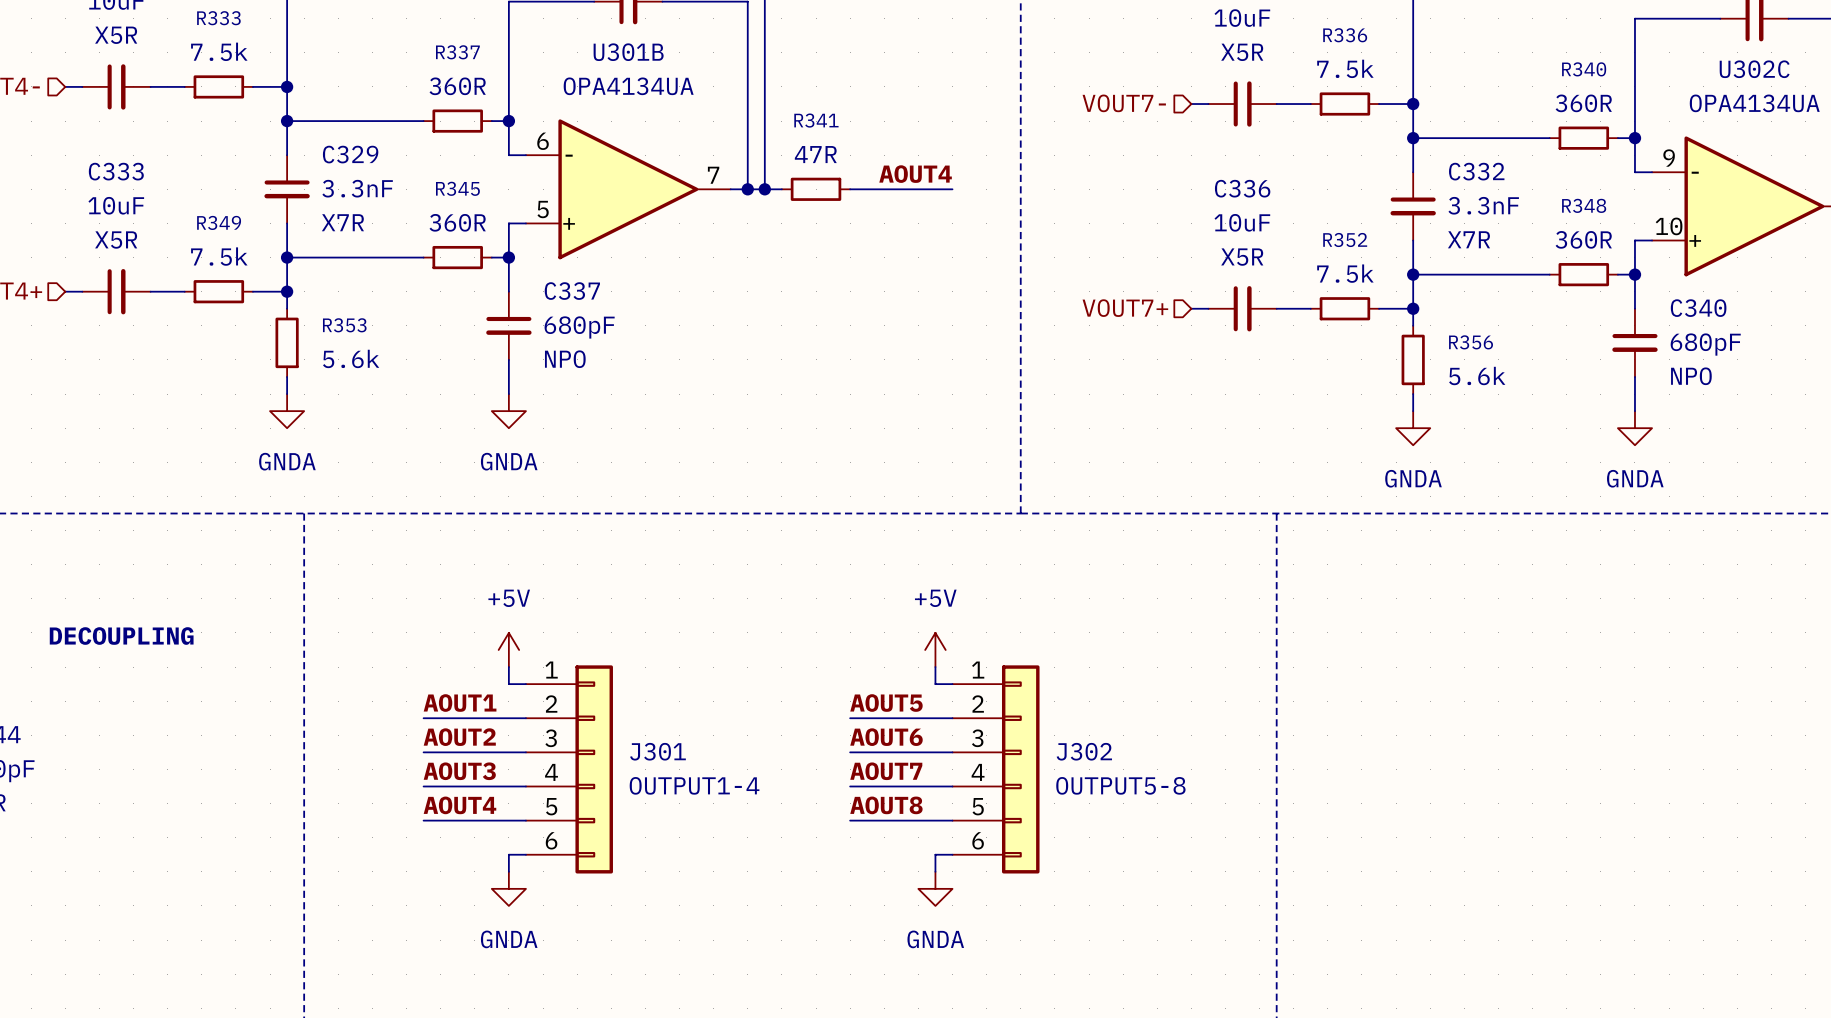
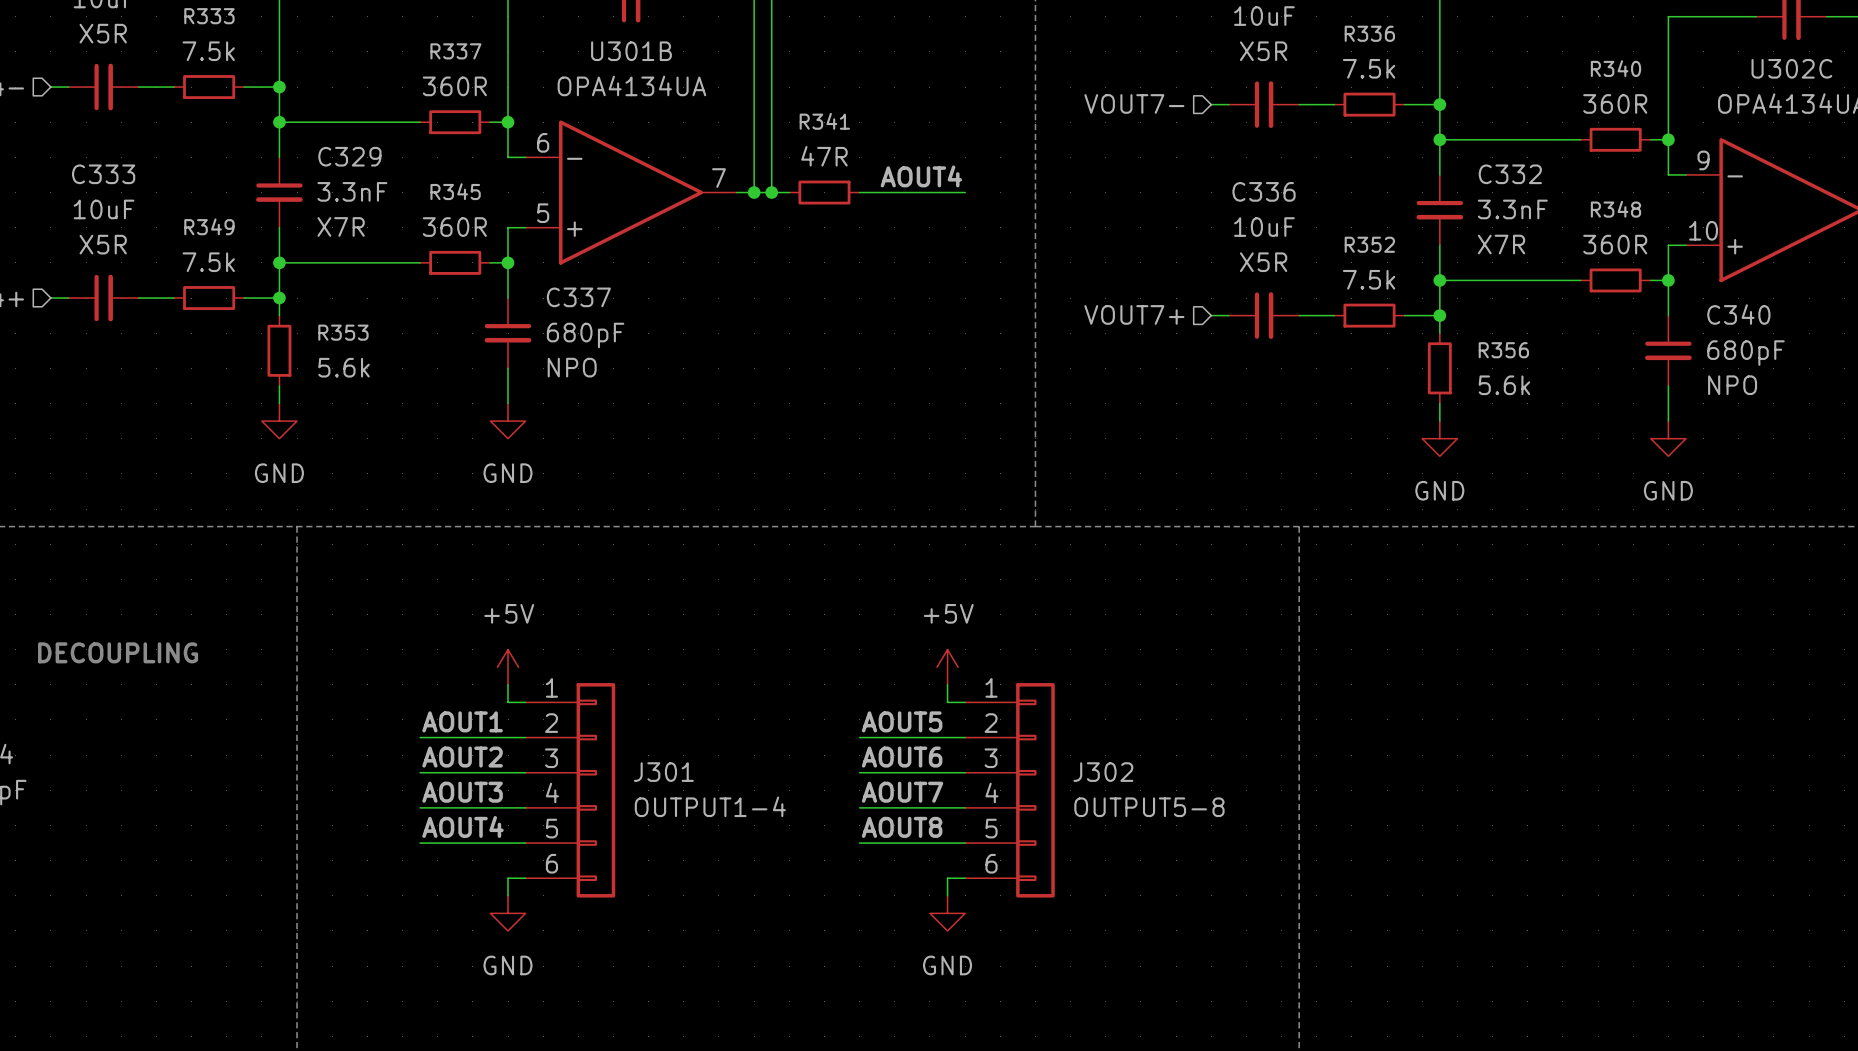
power symbol: GNDA (287, 411) -> GND (279, 421)
power symbol: GNDA (508, 411) -> GND (508, 421)
power symbol: GNDA (1413, 428) -> GND (1439, 438)
power symbol: GNDA (1634, 428) -> GND (1668, 438)
power symbol: GNDA (508, 888) -> GND (508, 913)
power symbol: GNDA (935, 888) -> GND (947, 913)

